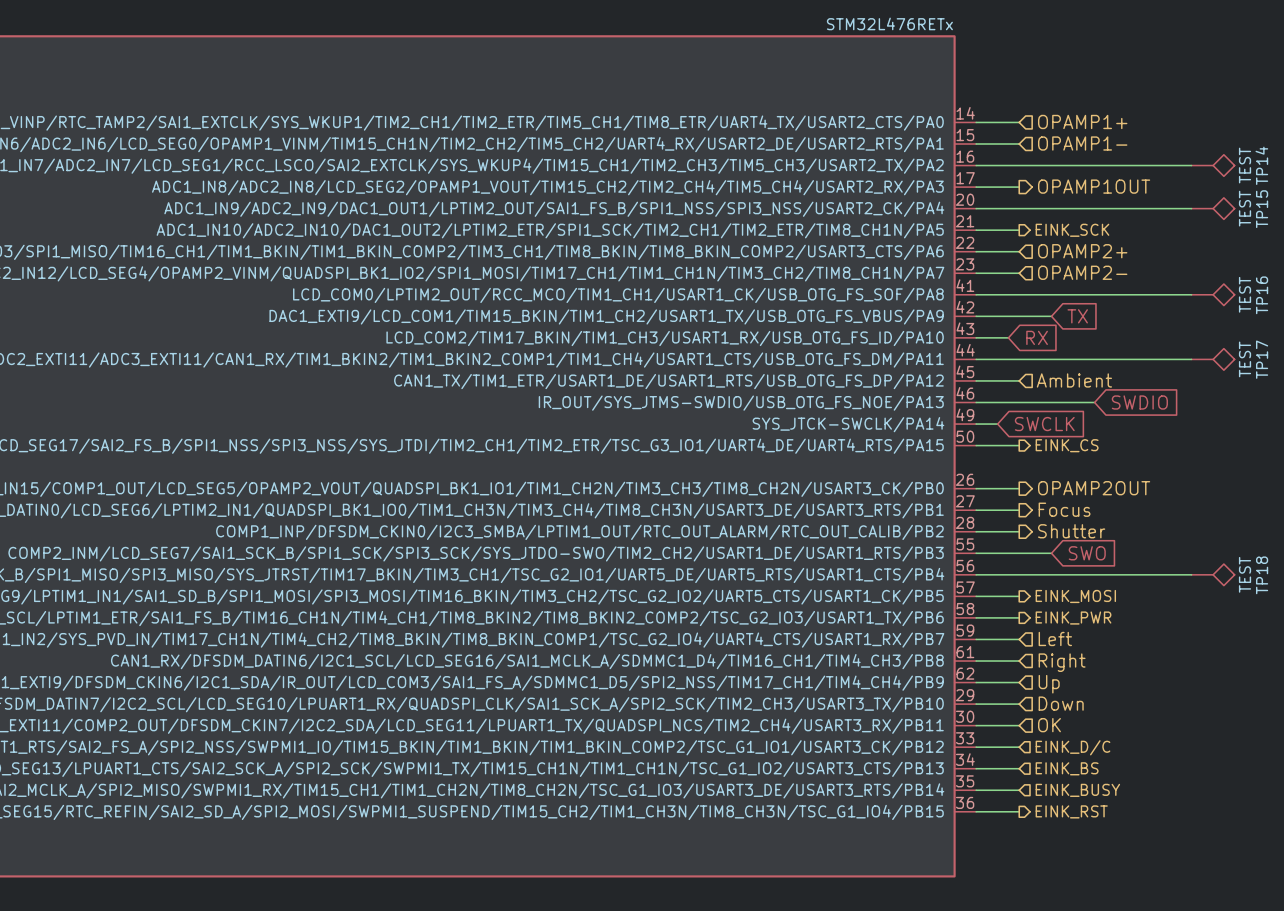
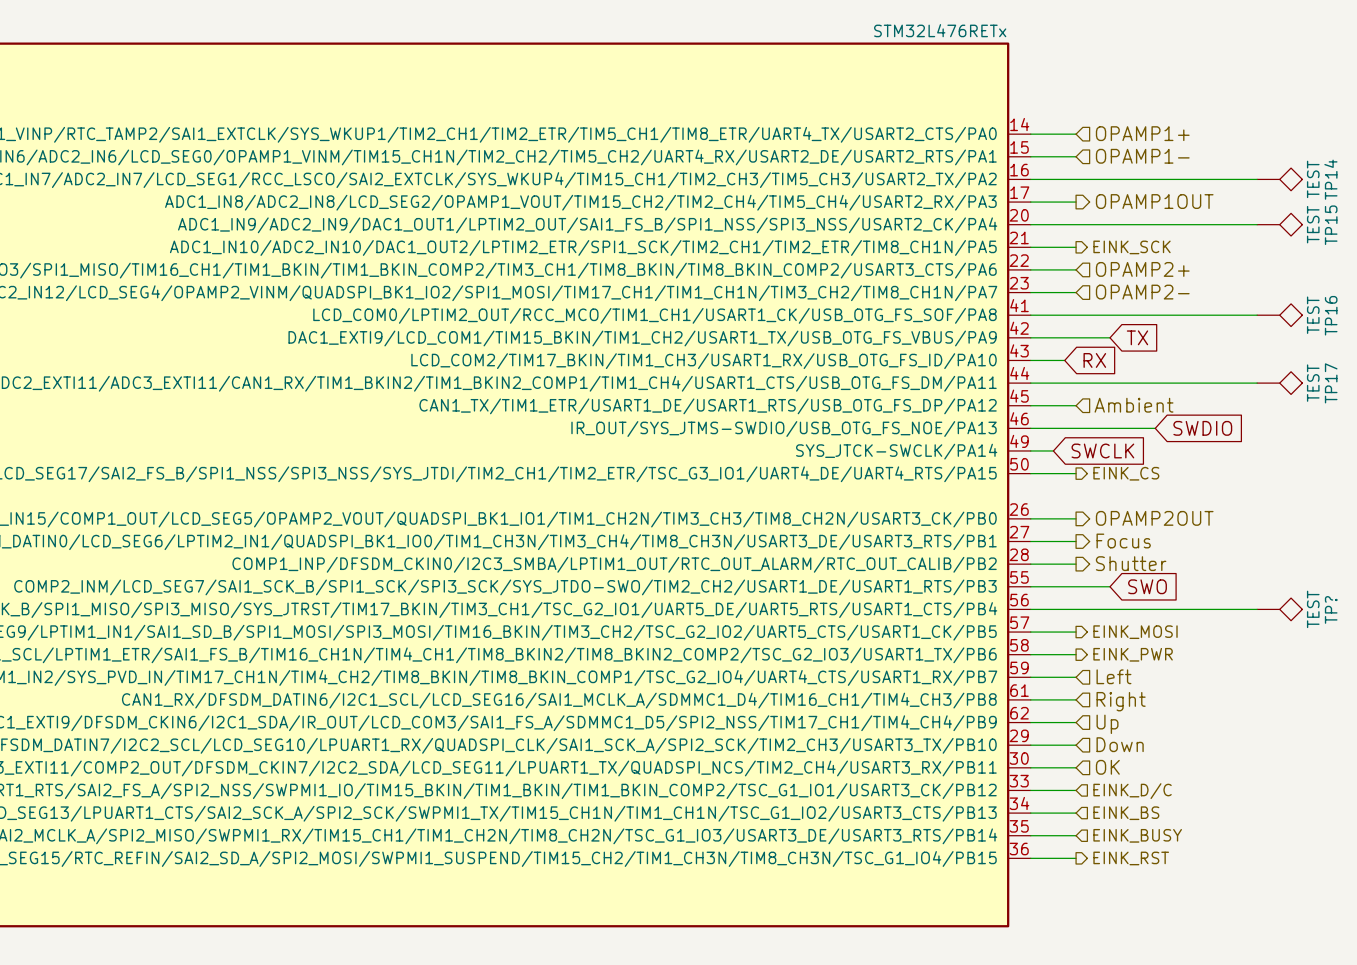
TP18 name: TP18 (1262, 575) -> TP? (1331, 609)

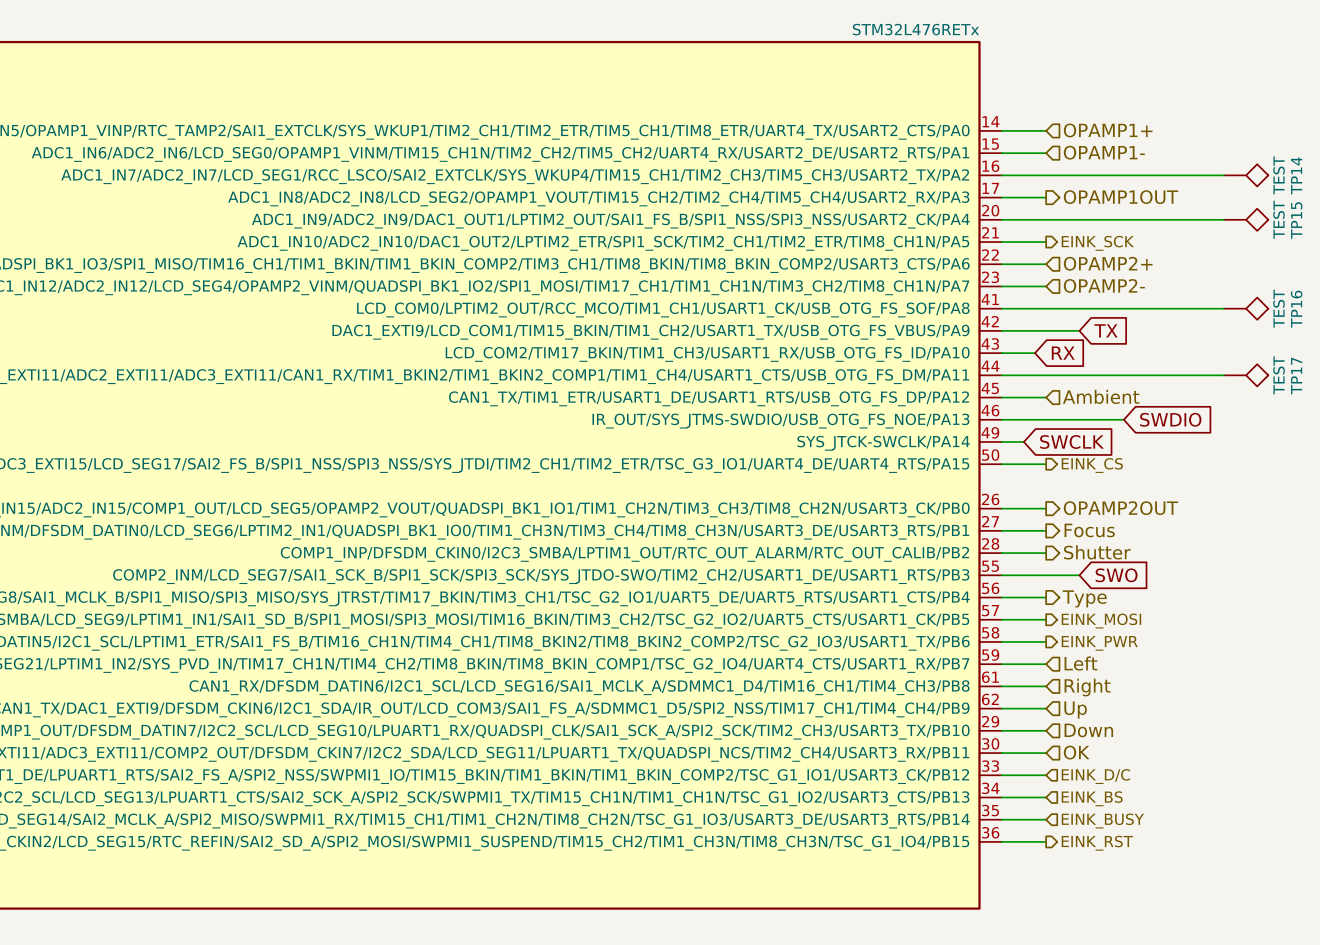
wire: (1076, 609) (1257, 609) -> none
TP?: TEST (1279, 609) -> none
hierarchical label: none -> Type (1084, 598)

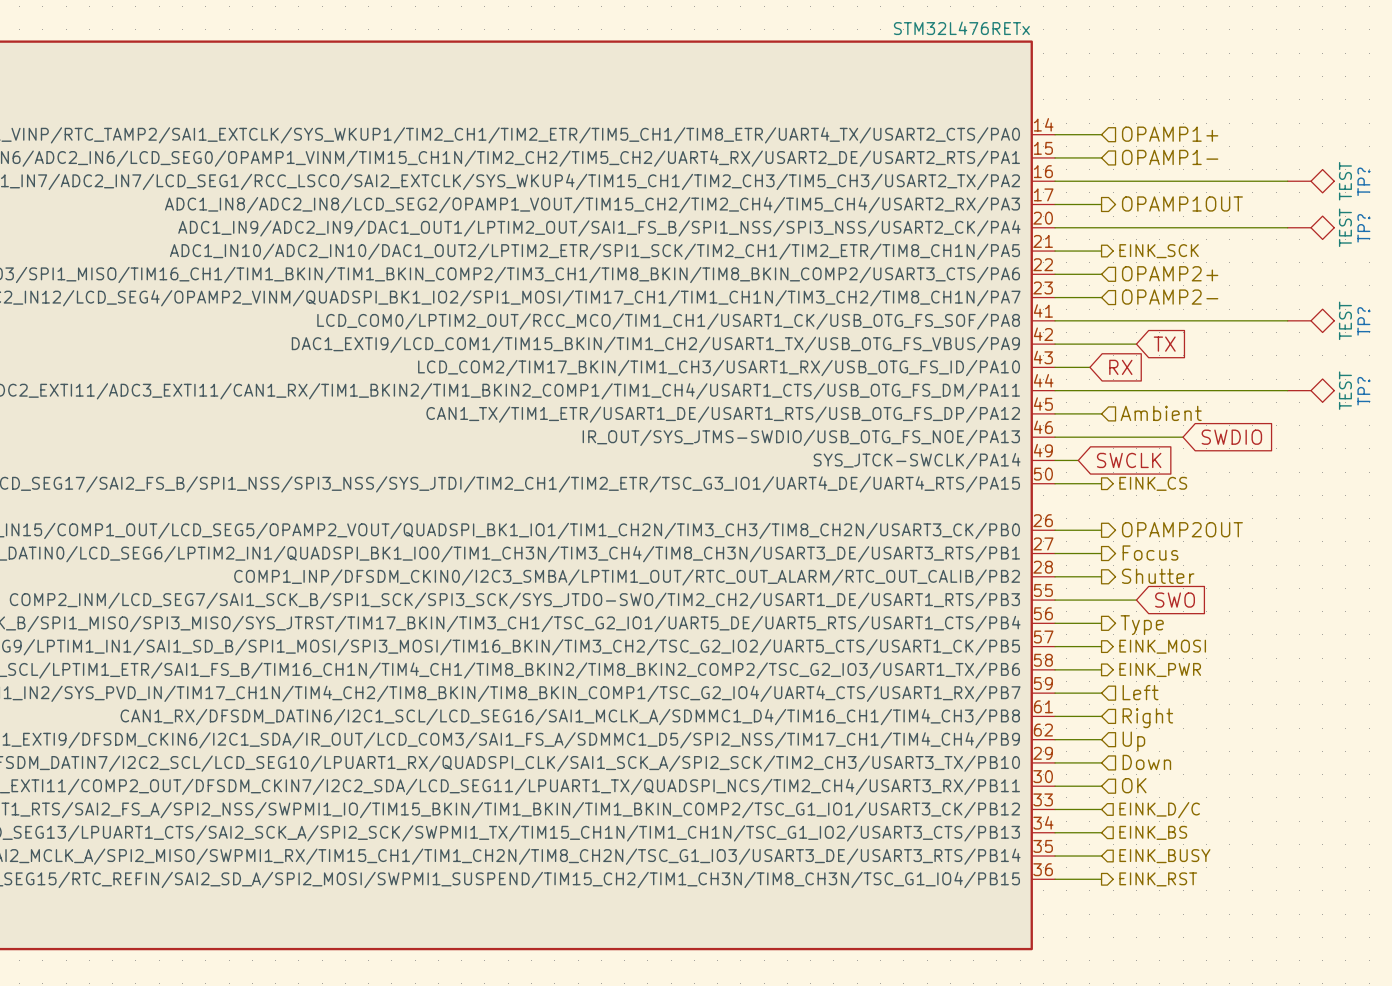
TP14 name: TP14 (1296, 175) -> TP? (1363, 181)
TP15 name: TP15 (1296, 220) -> TP? (1363, 228)
TP16 name: TP16 (1296, 309) -> TP? (1363, 321)
TP17 name: TP17 (1296, 376) -> TP? (1363, 391)

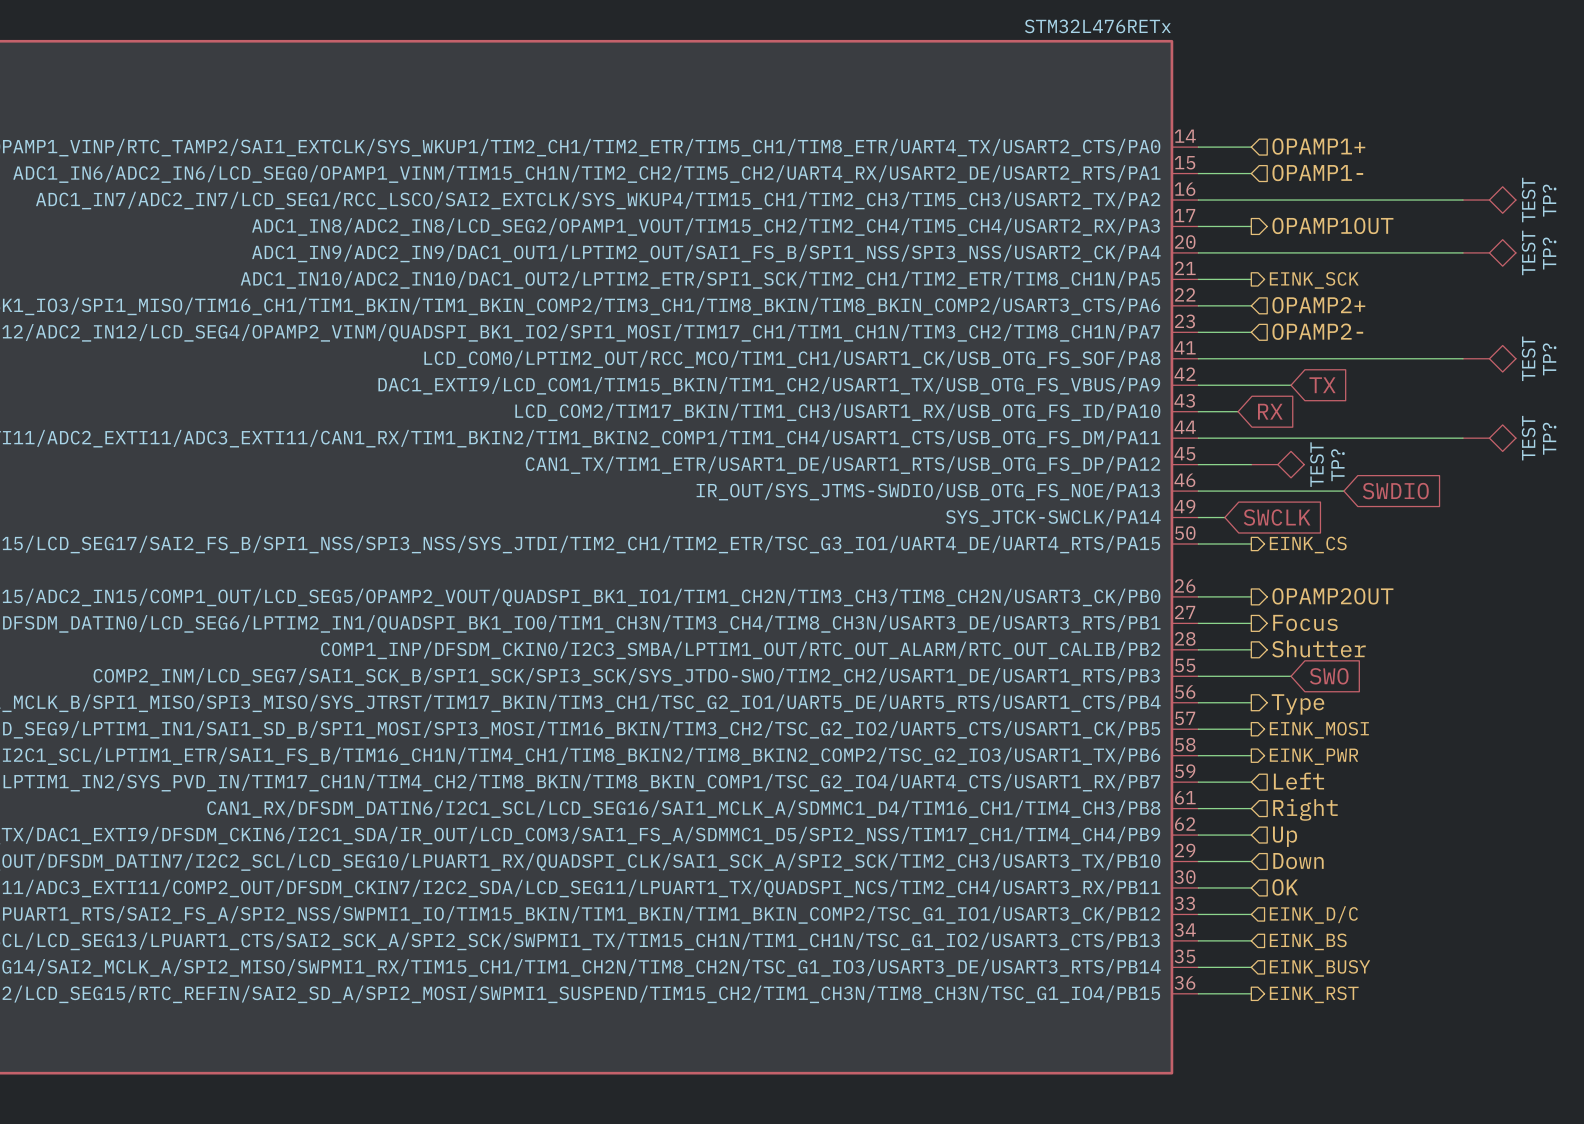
TP?: none -> TEST (1277, 464)
hierarchical label: Ambient (1161, 413) -> none

